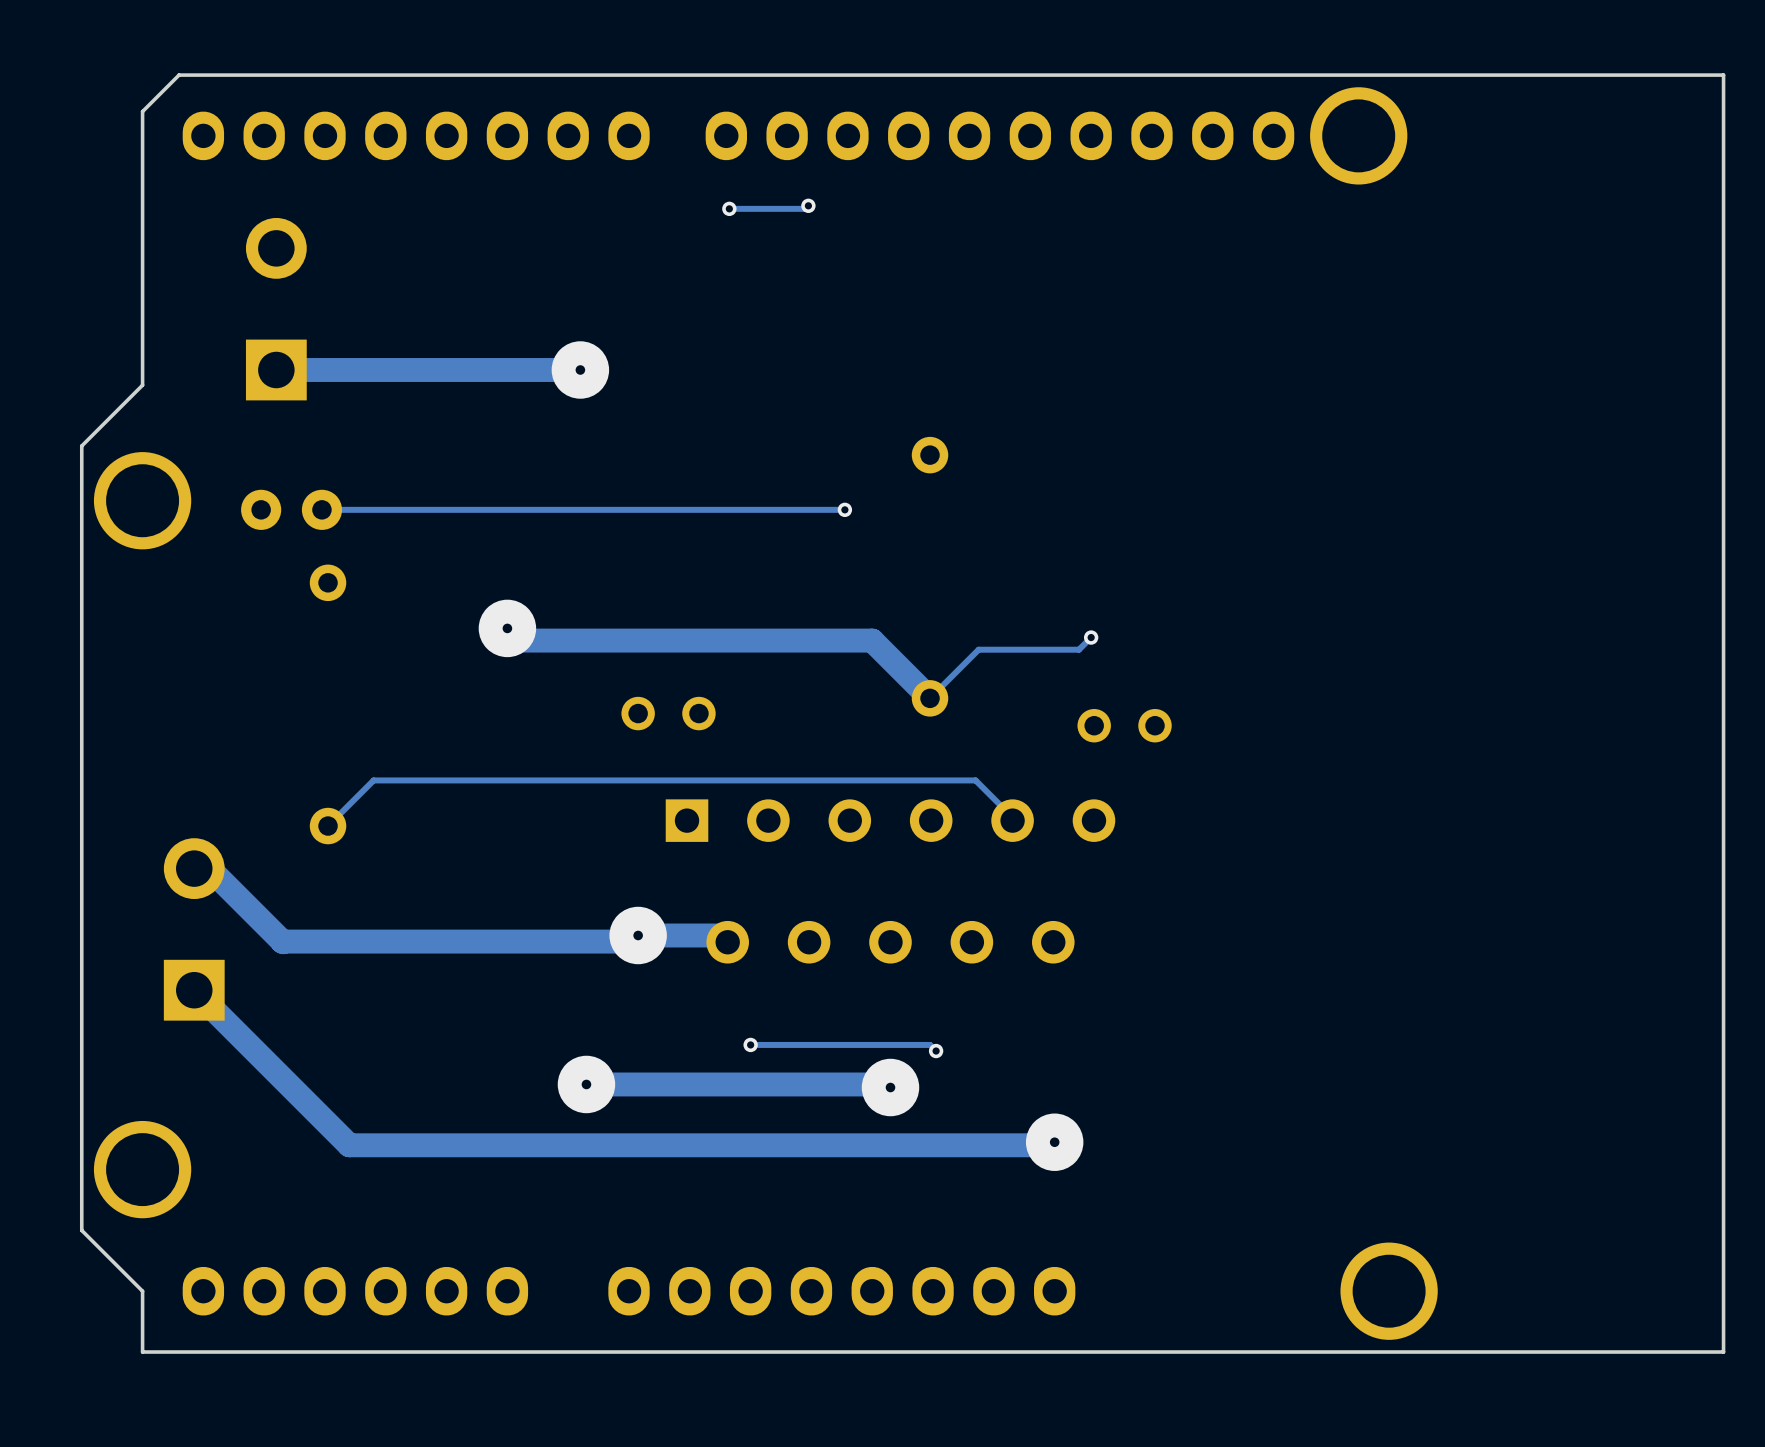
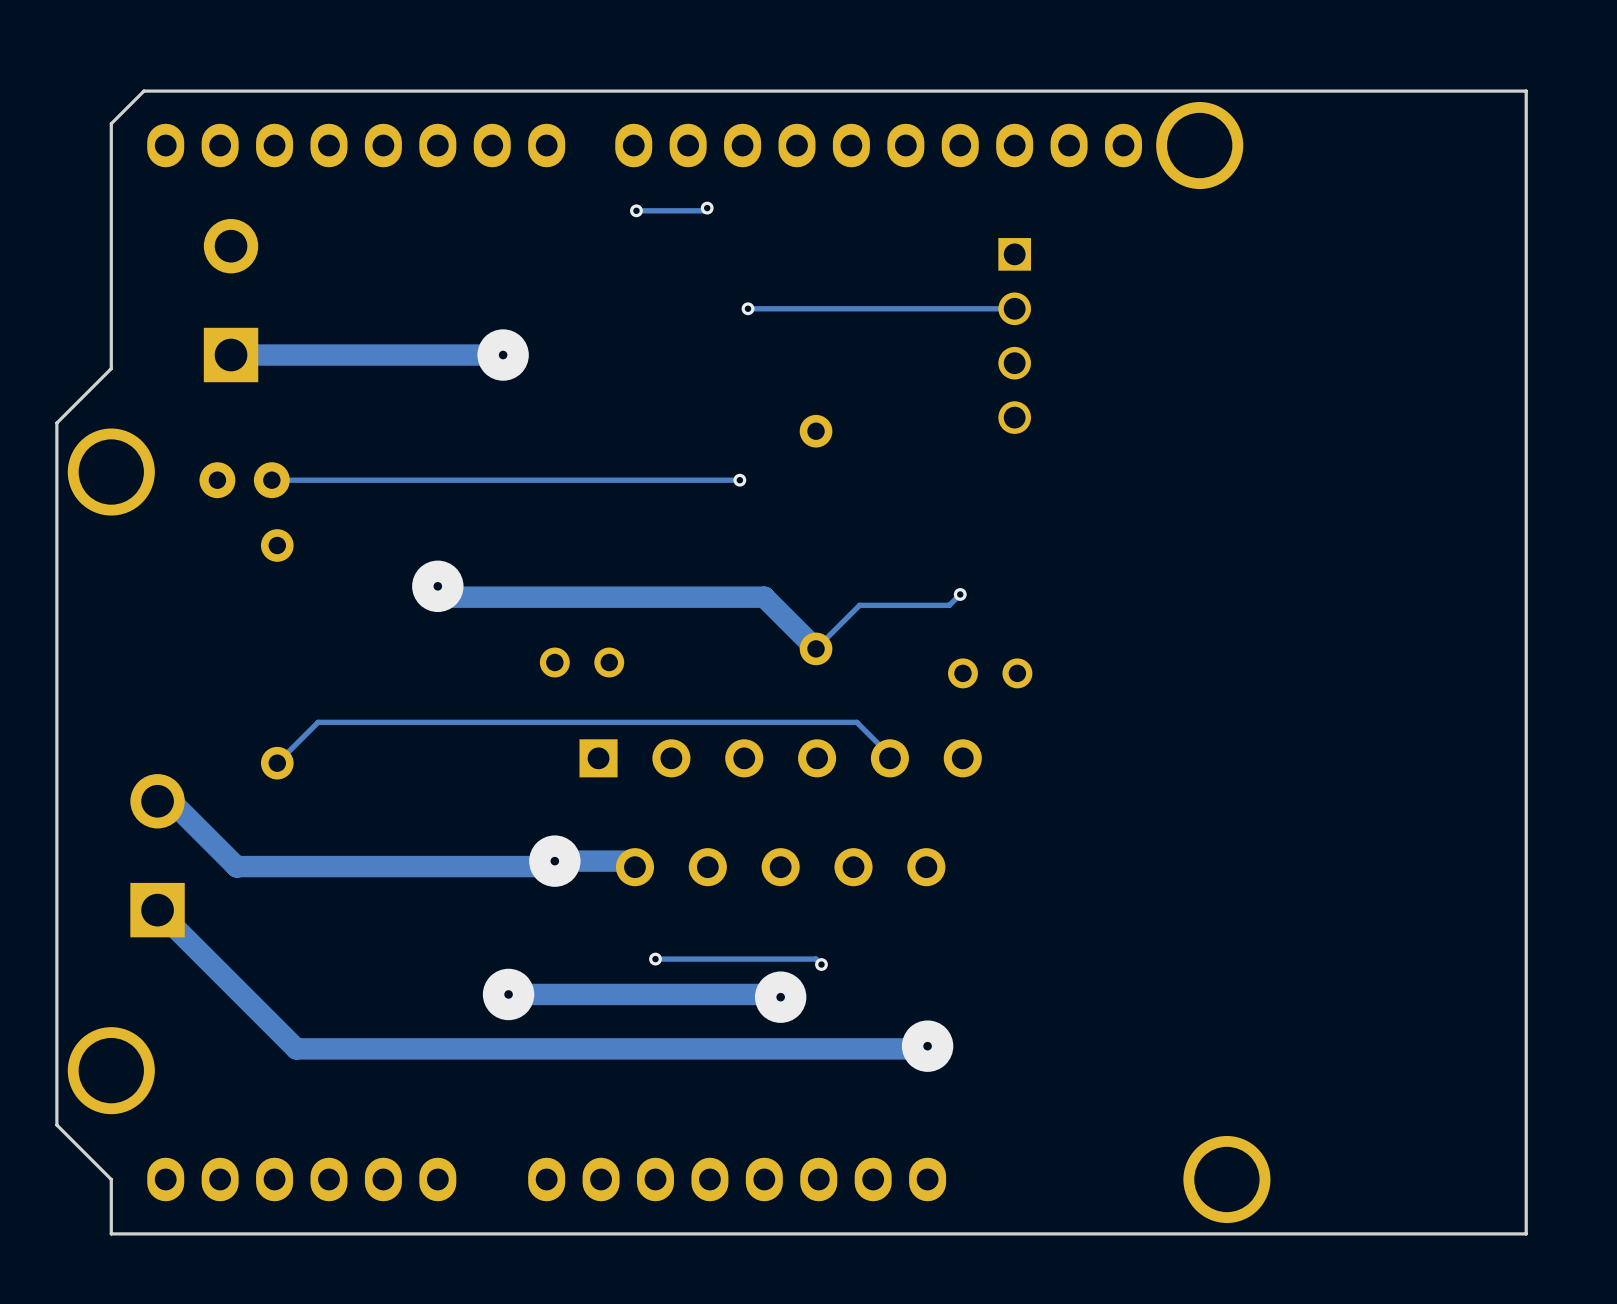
via: none -> (748, 308)
track: none -> (1014, 308) (748, 308)
part: none -> (1014, 335)

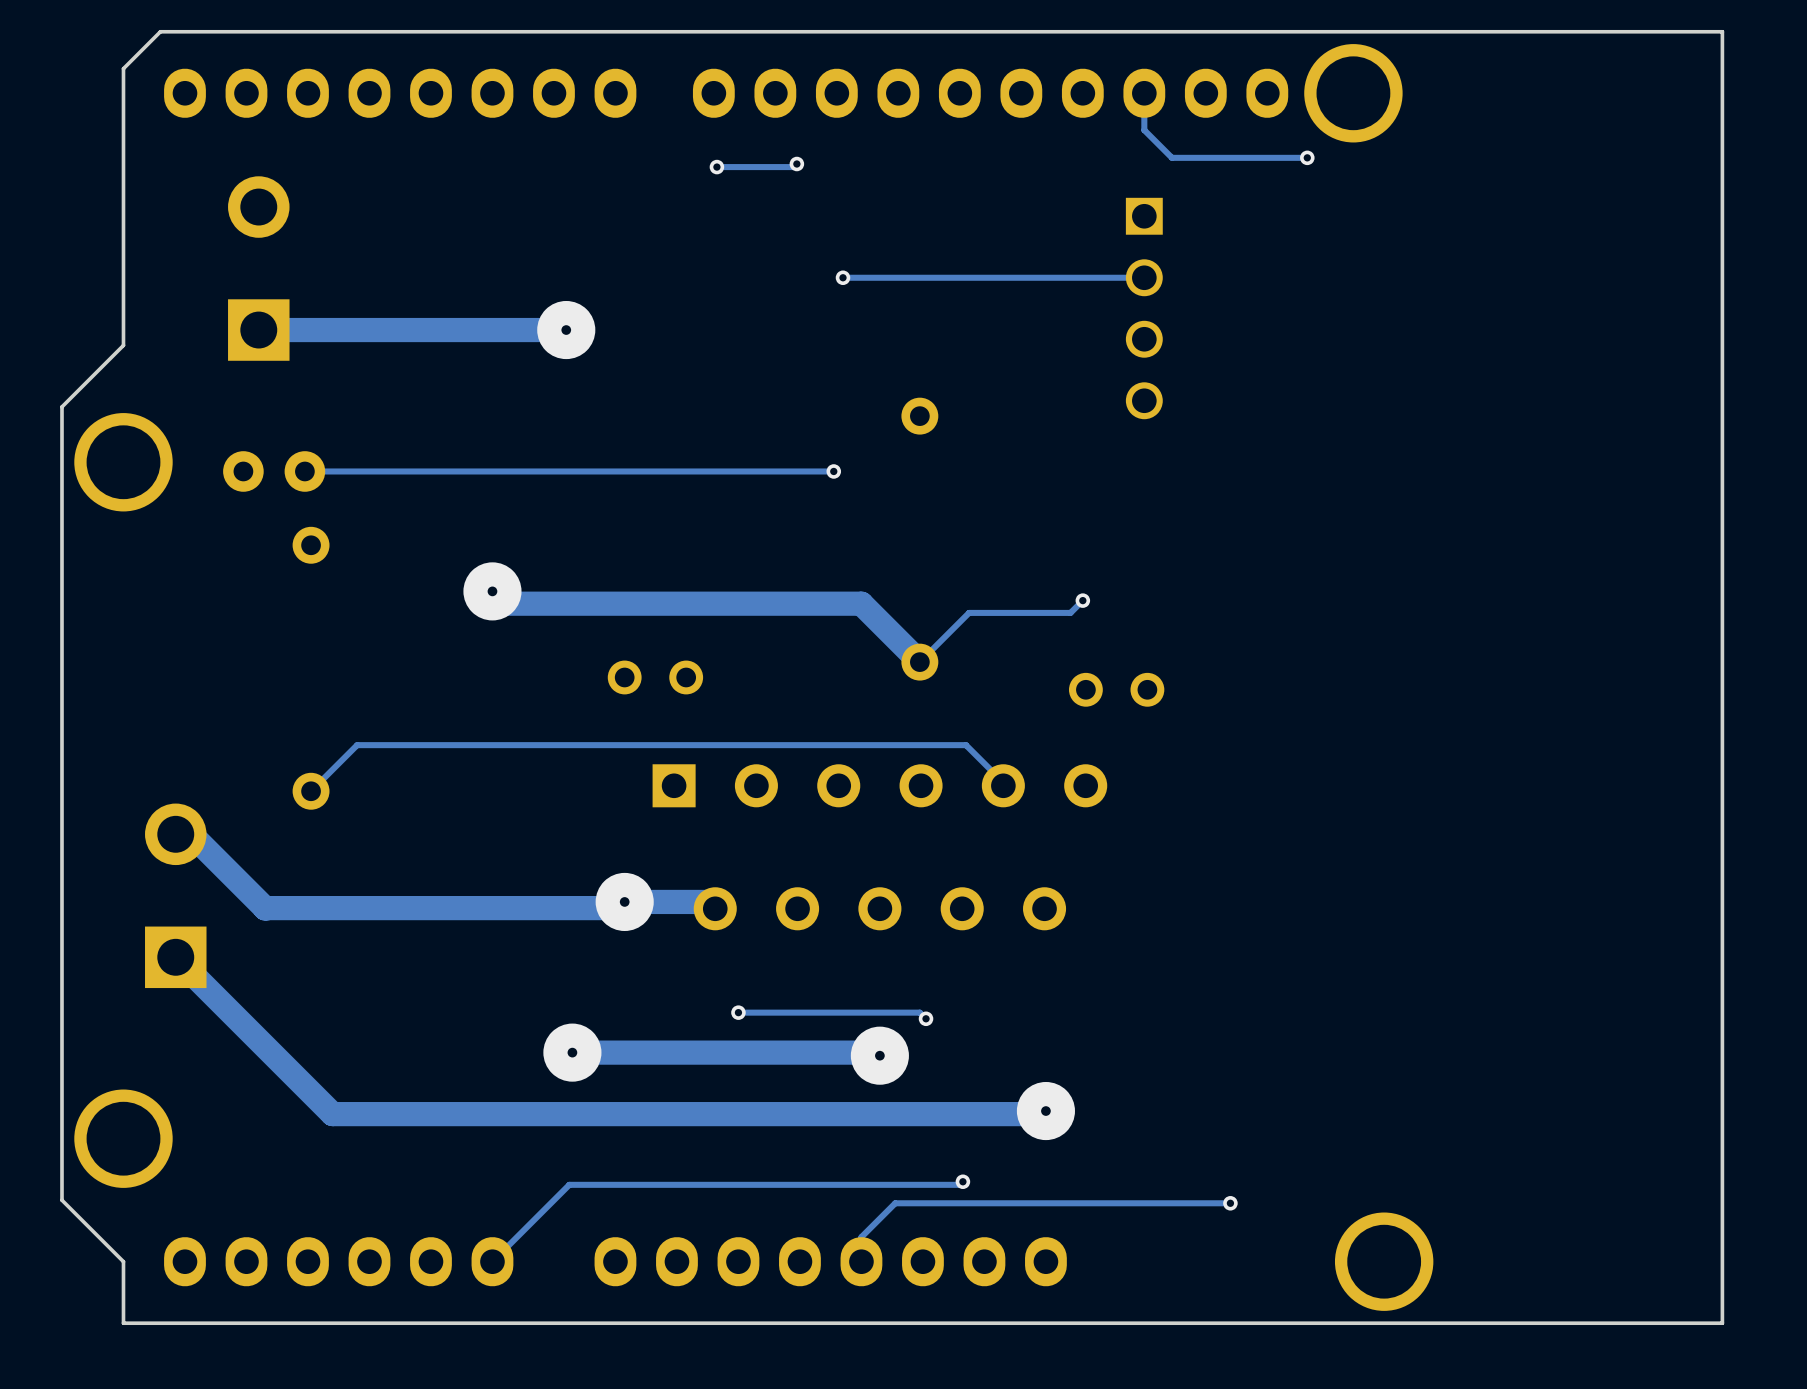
track: none -> (1144, 93) (1144, 130) (1172, 157) (1307, 157)
via: none -> (1307, 157)
track: none -> (962, 1181) (959, 1184) (569, 1184) (492, 1261)
via: none -> (962, 1181)
track: none -> (1230, 1203) (895, 1203) (861, 1237) (861, 1261)
via: none -> (1230, 1203)

